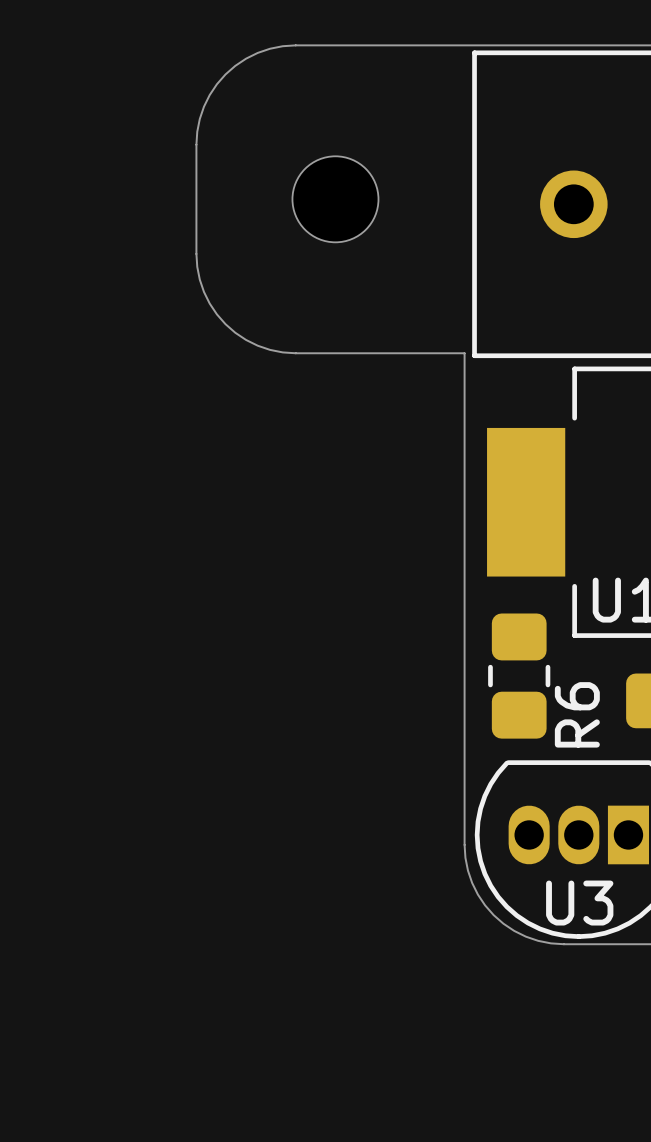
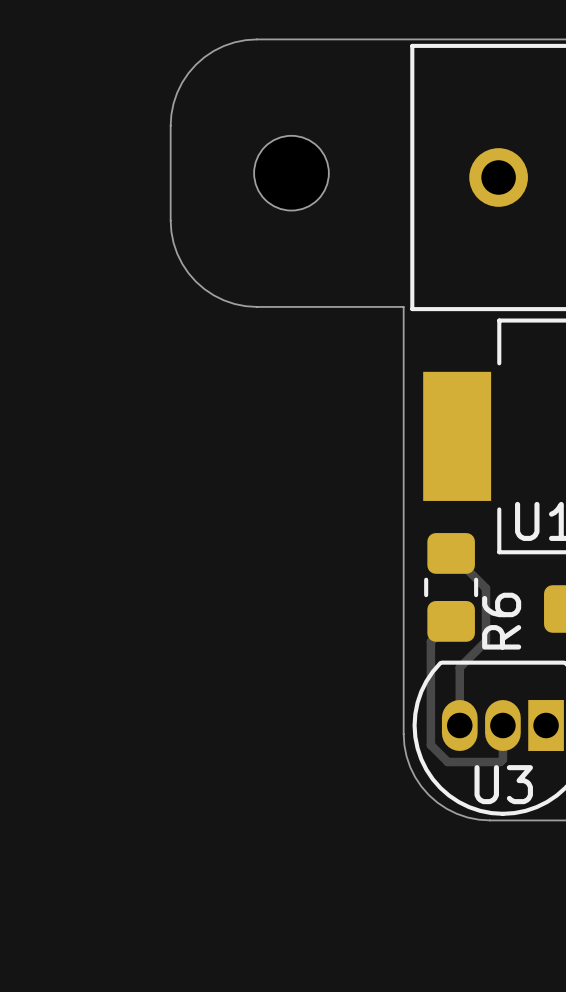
track: none -> (451, 553) (485, 588) (485, 641) (459, 667) (459, 725)
track: none -> (451, 621) (430, 641) (430, 745) (447, 762) (500, 762) (502, 759) (502, 725)

